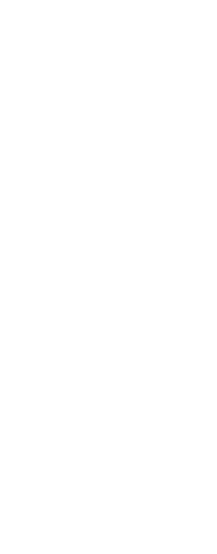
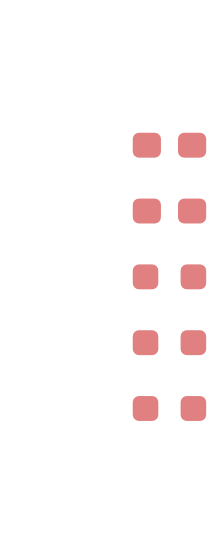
part: none -> (169, 145)
part: none -> (169, 211)
part: none -> (169, 276)
part: none -> (169, 342)
part: none -> (169, 408)

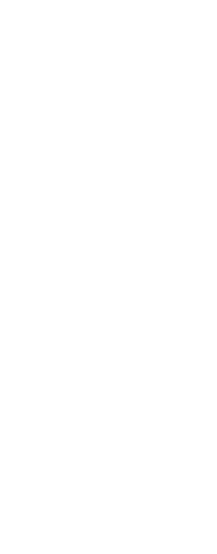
part: (169, 145) -> none
part: (169, 211) -> none
part: (169, 276) -> none
part: (169, 342) -> none
part: (169, 408) -> none

